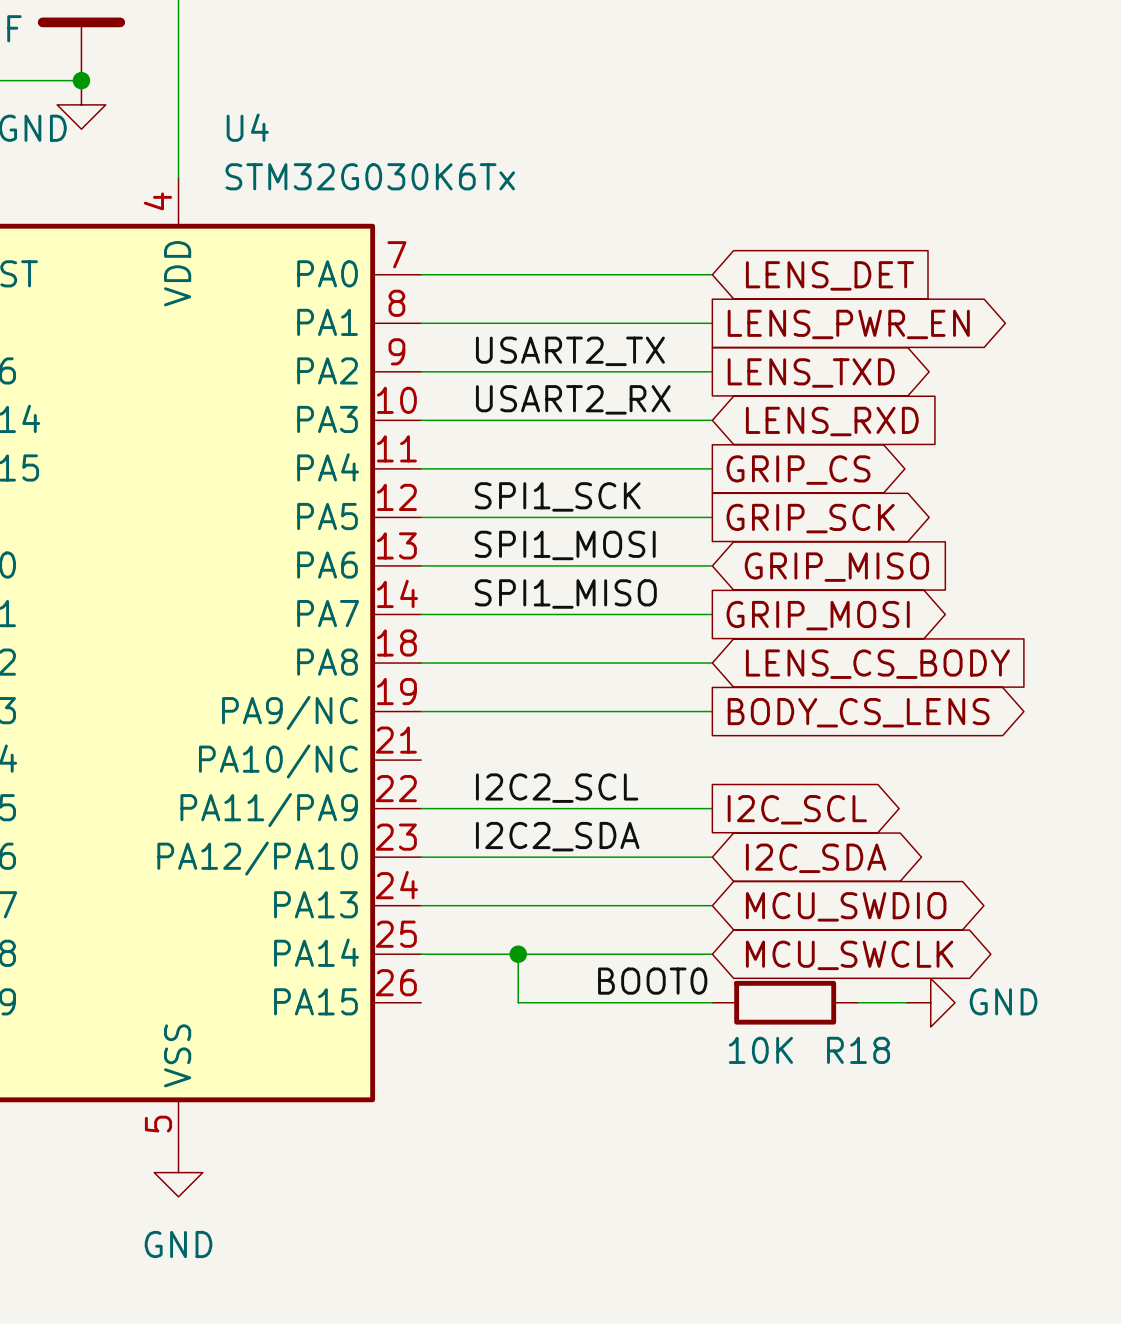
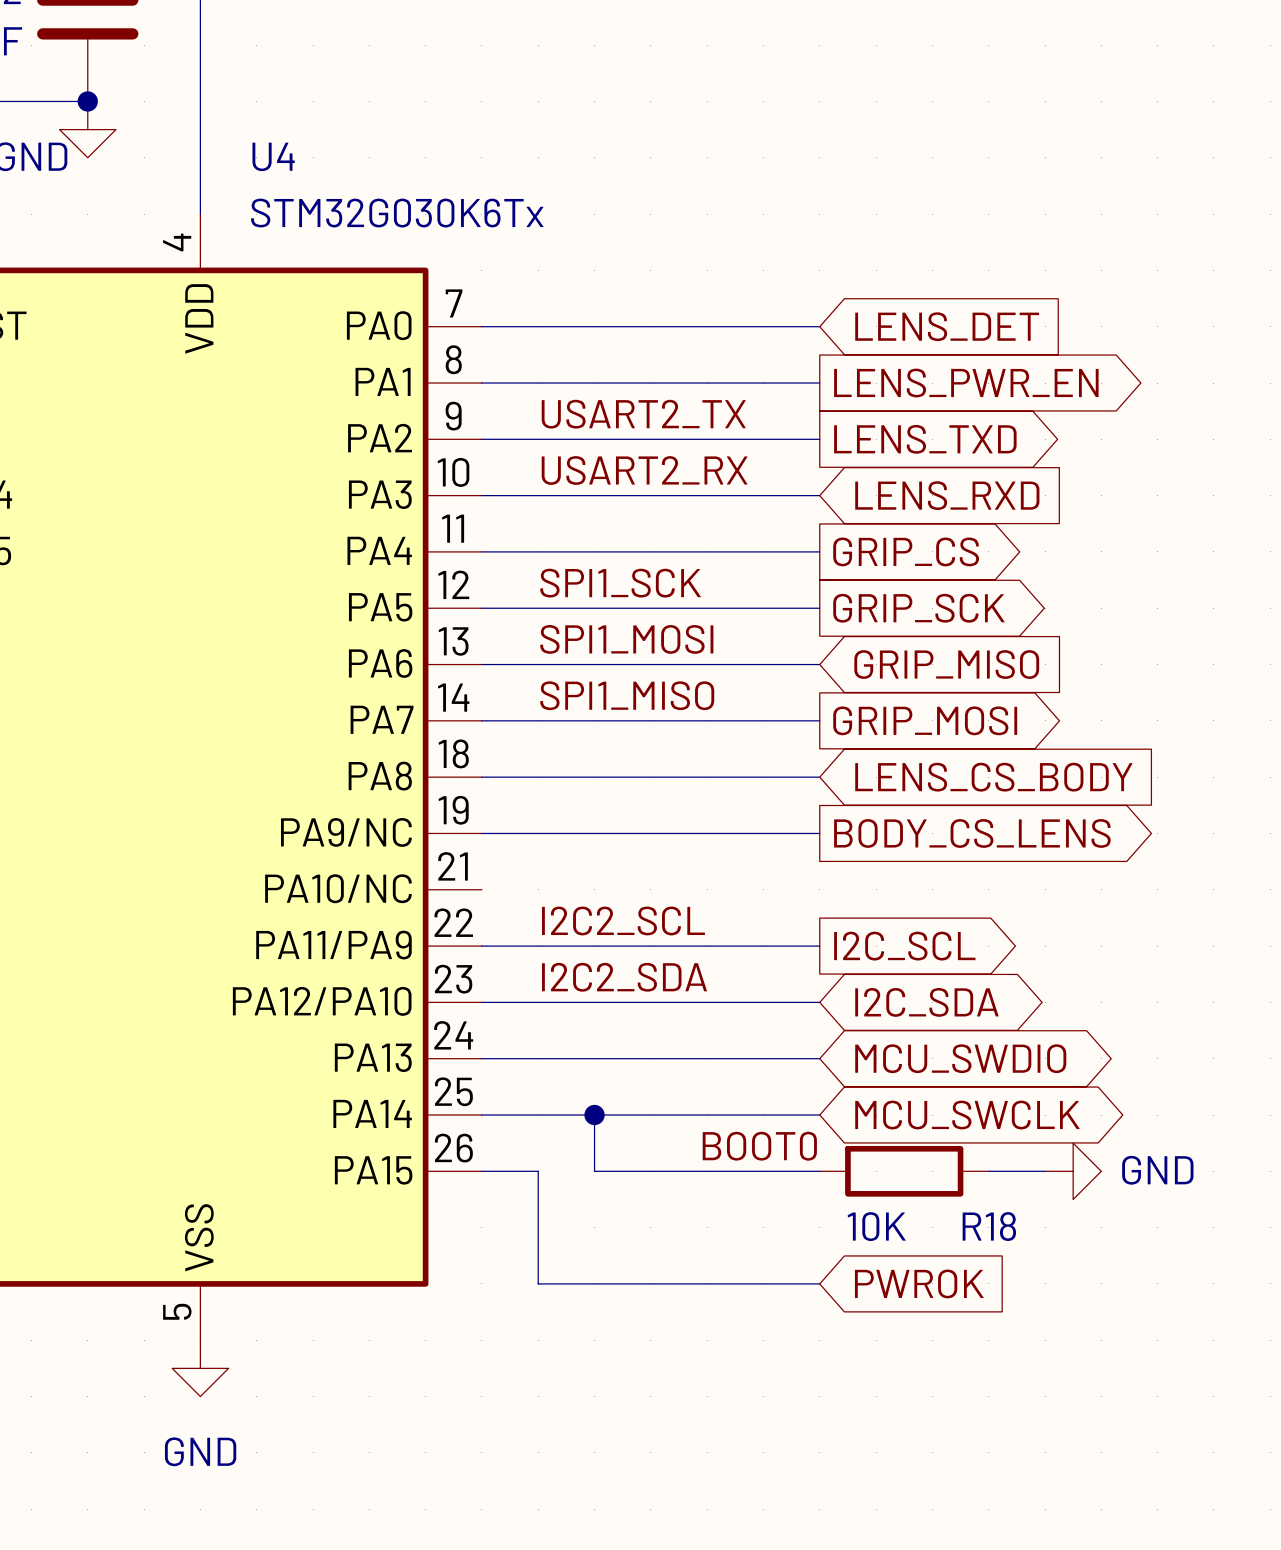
wire: none -> (481, 1171) (538, 1171) (538, 1283) (819, 1283)
global label: none -> PWROK (919, 1283)

